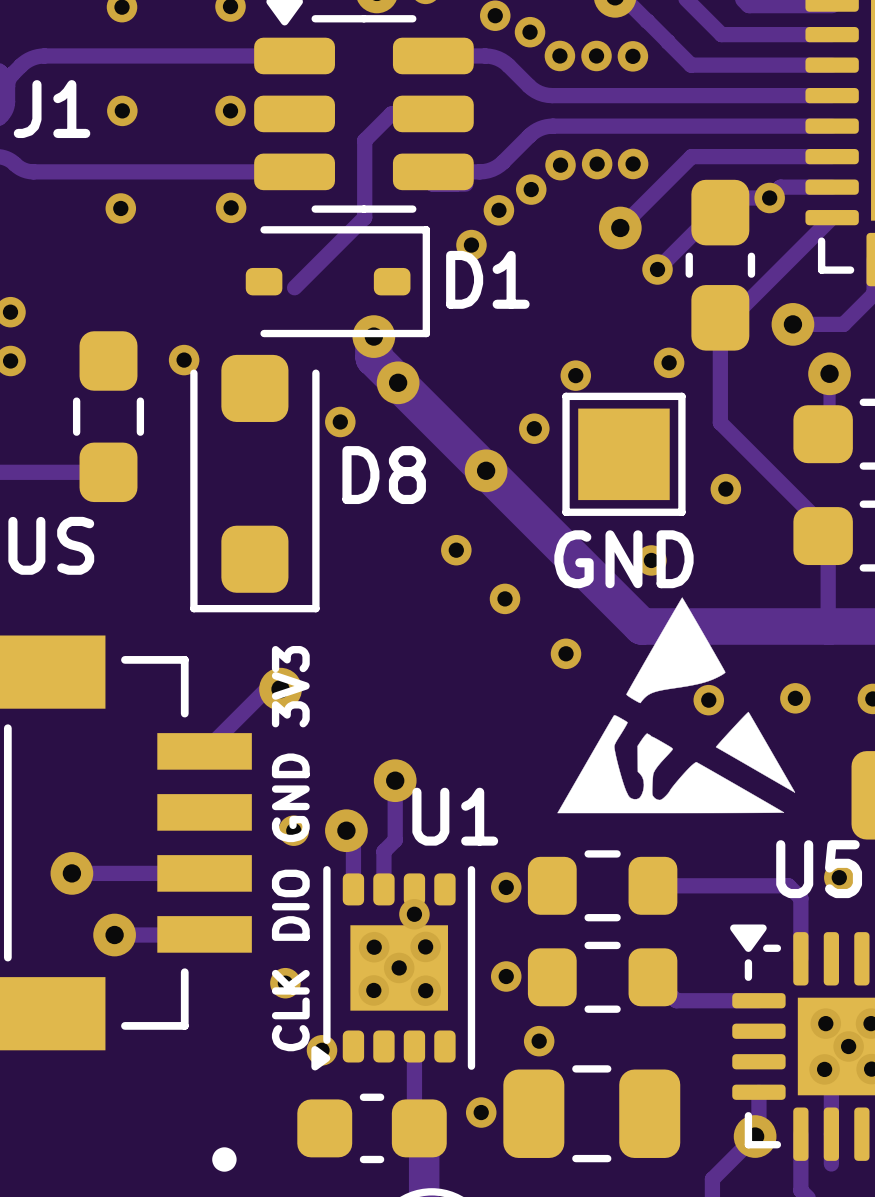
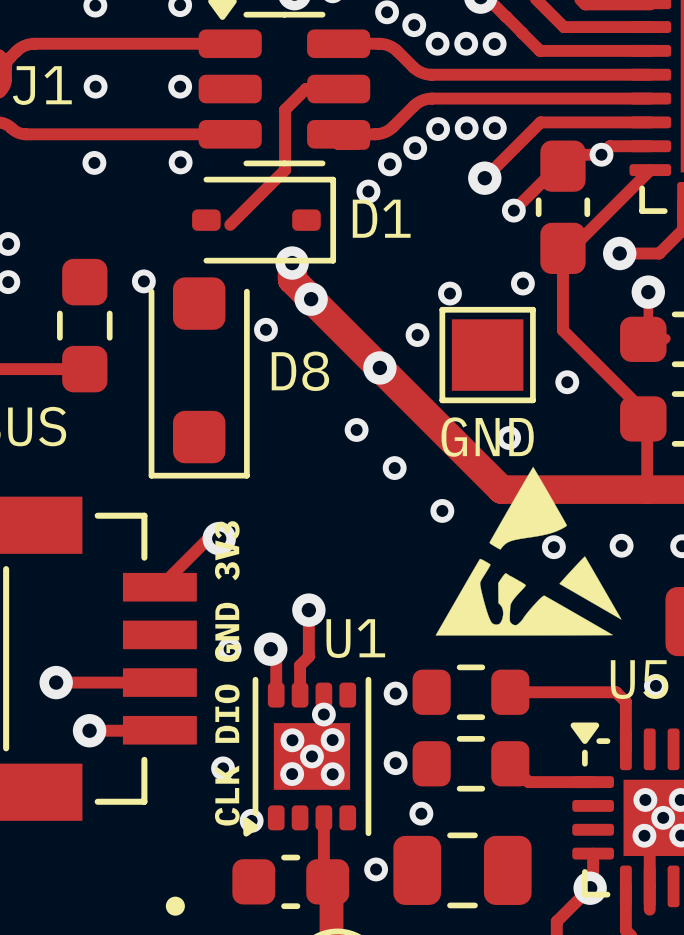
track: none -> (665, 338) (665, 339)

